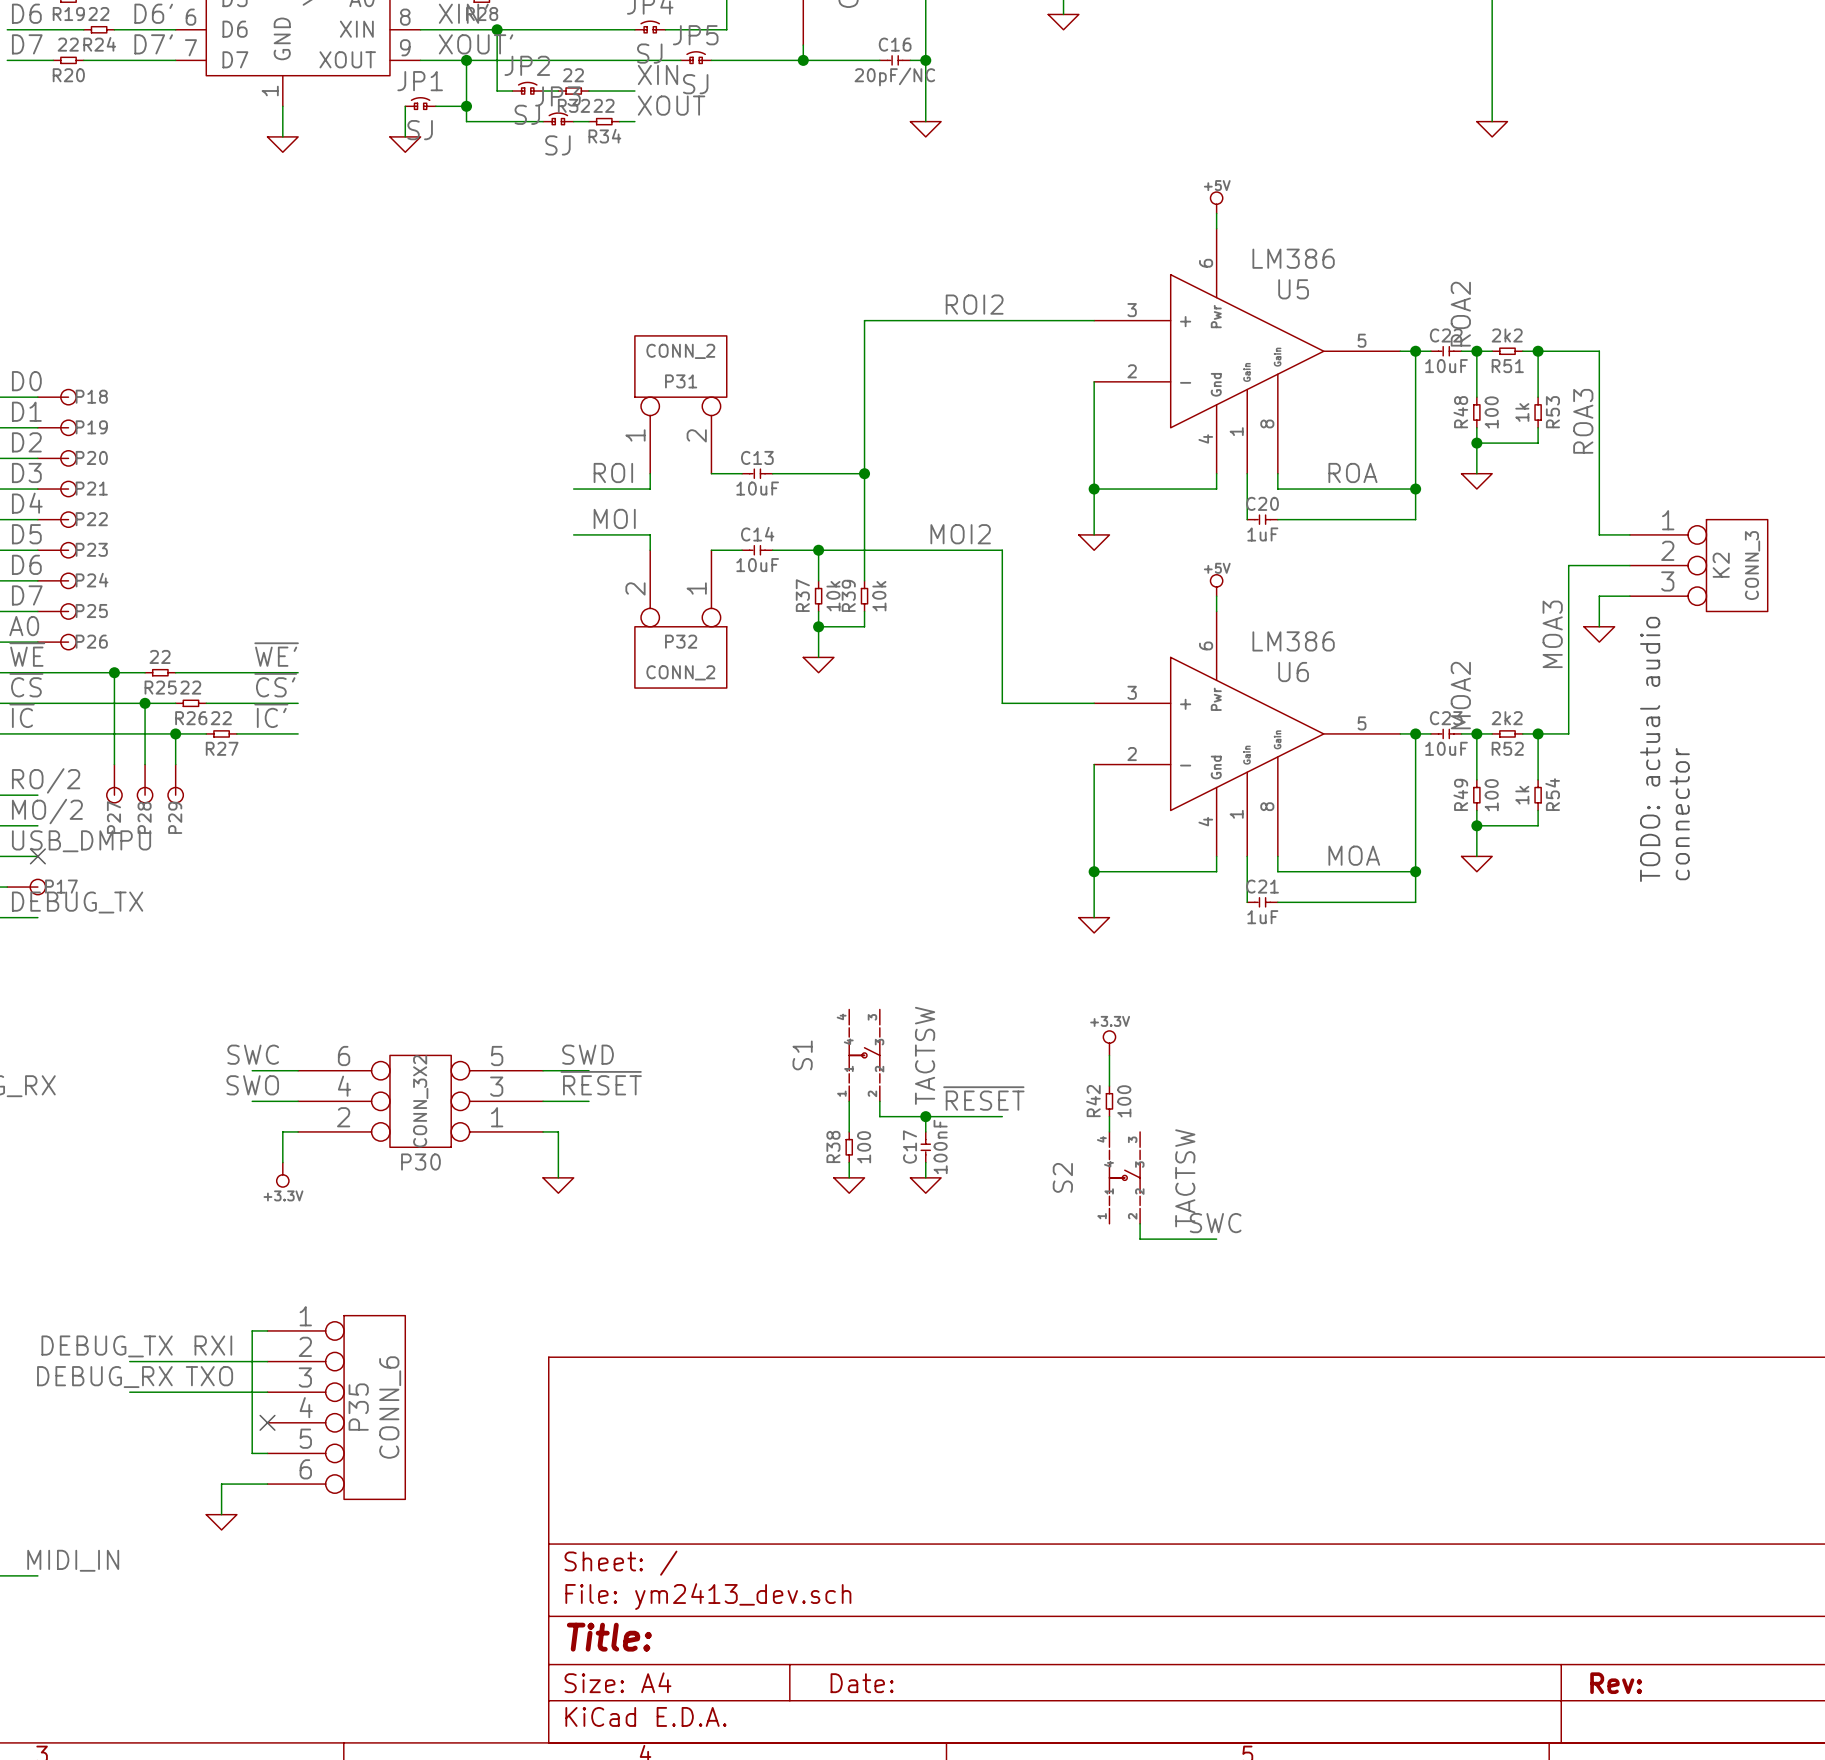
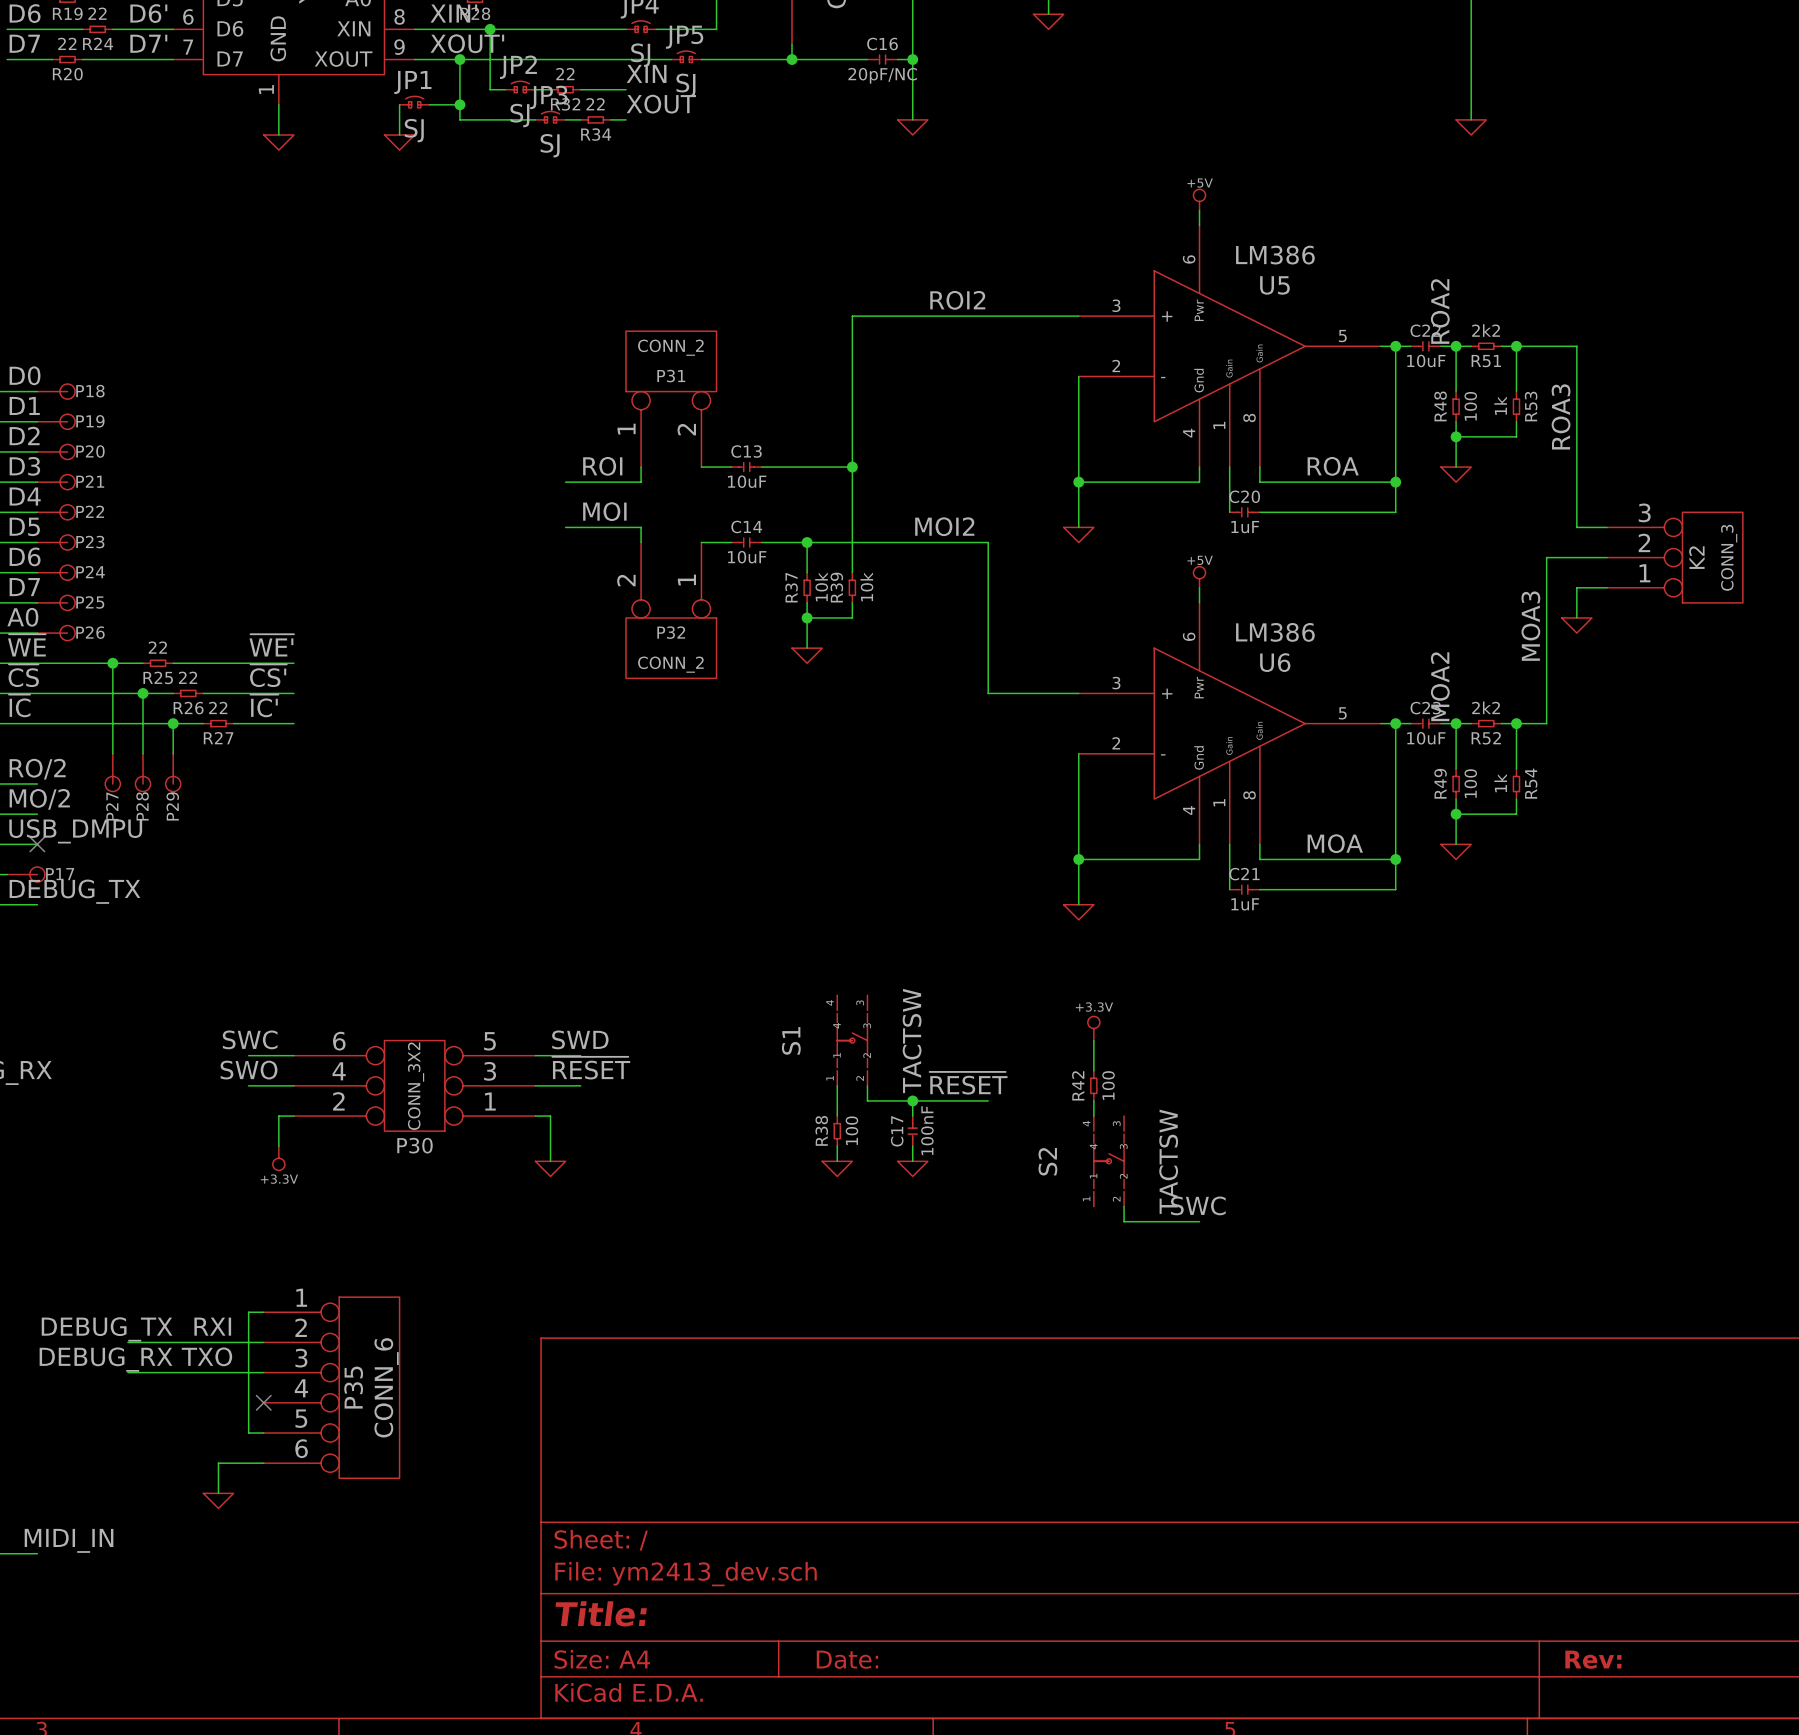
K2 flip: as is (1737, 565) -> up-down (1712, 557)
text: TODO: actual audio (1650, 749) -> none
text: connector (1679, 814) -> none

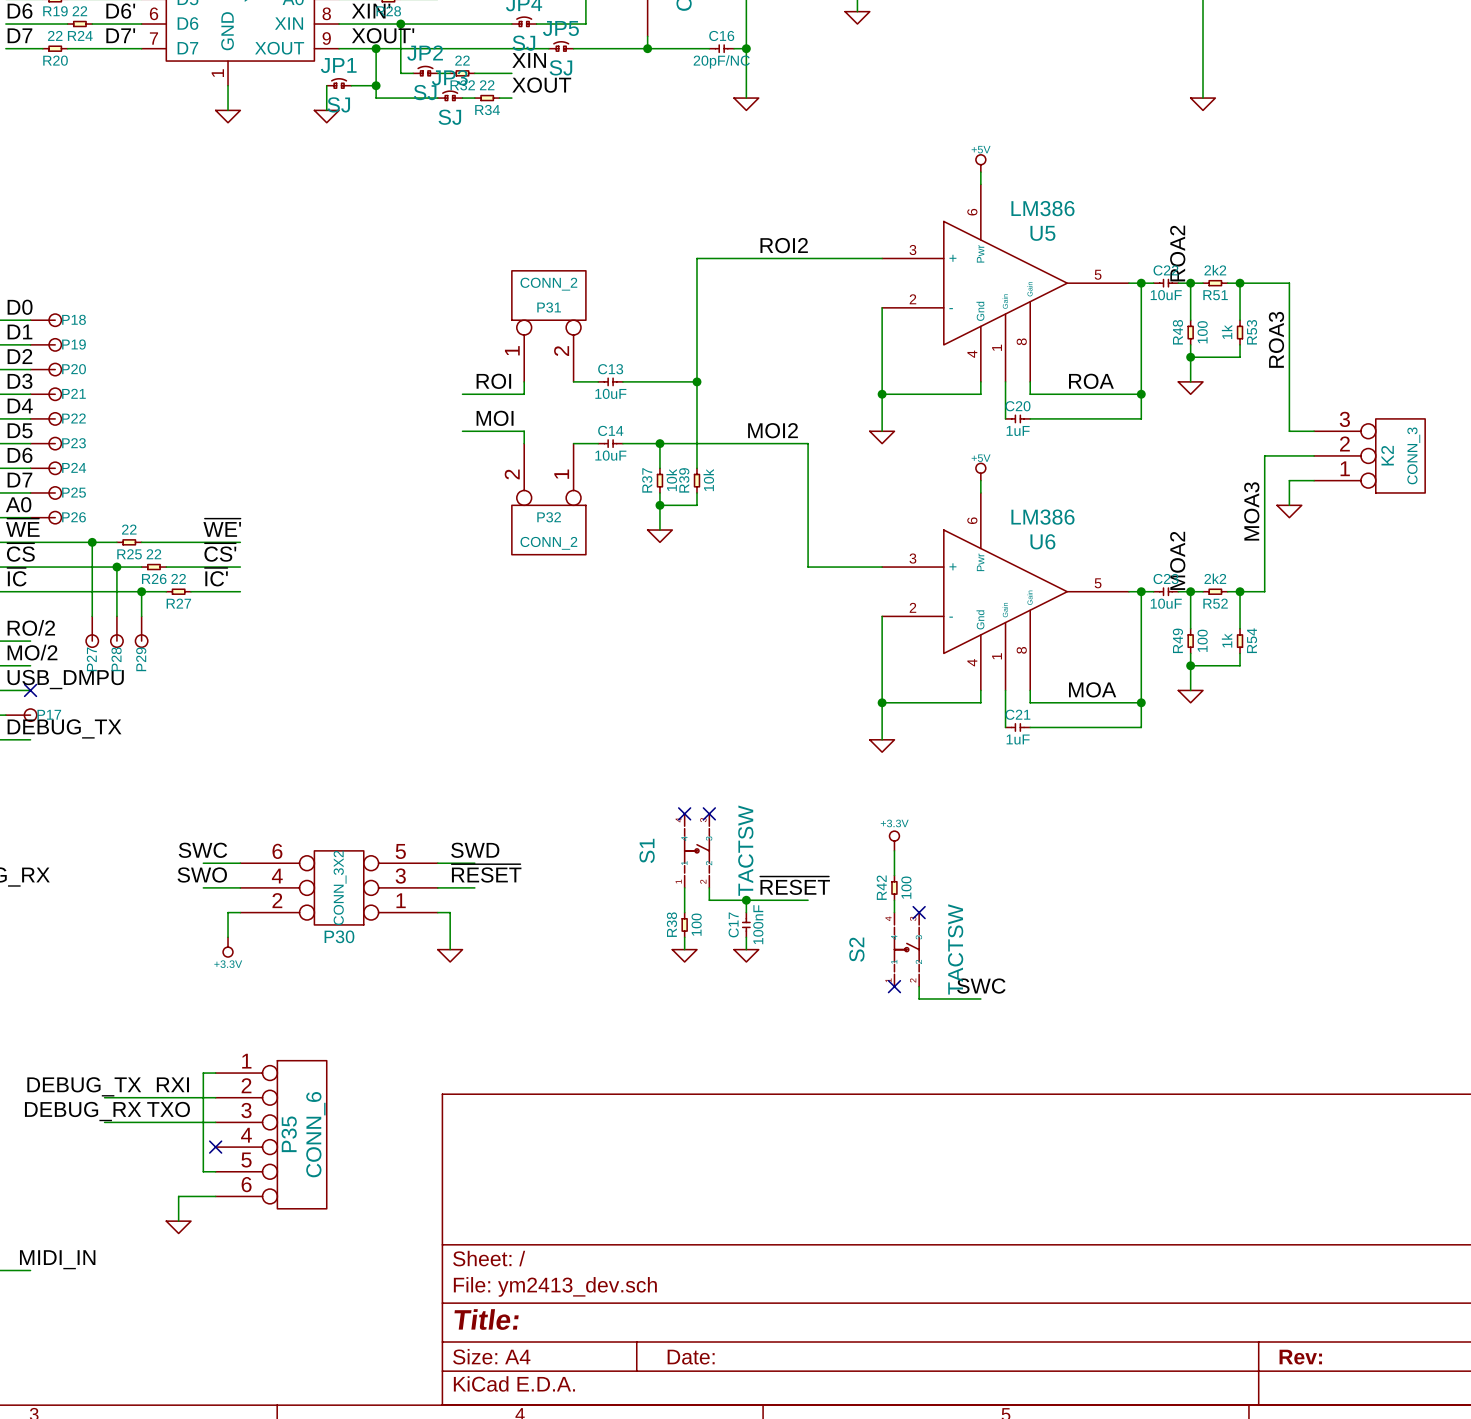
no-connect mark: none -> (684, 813)
no-connect mark: none -> (709, 813)
no-connect mark: none -> (919, 912)
no-connect mark: none -> (894, 986)

